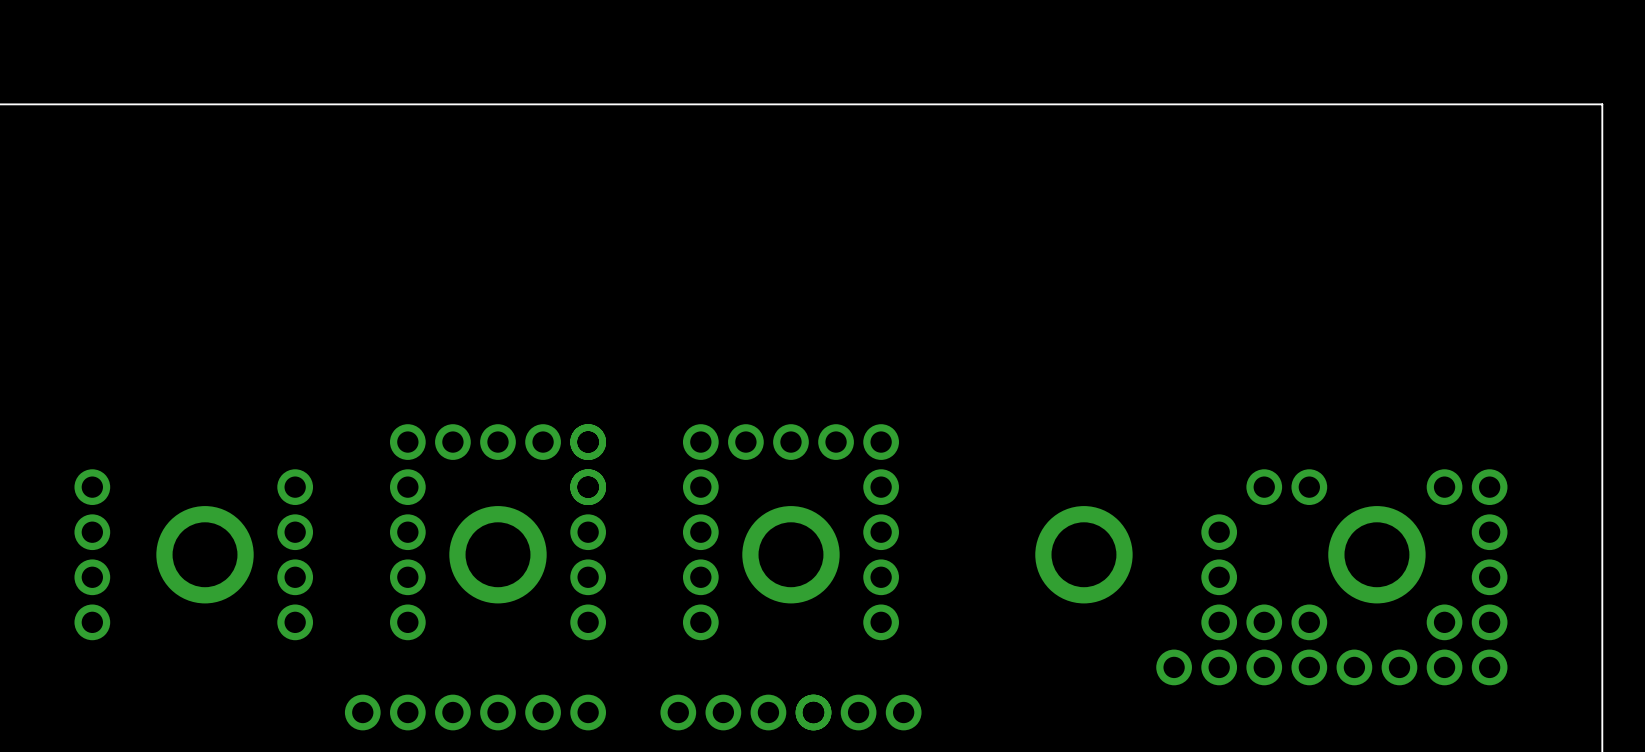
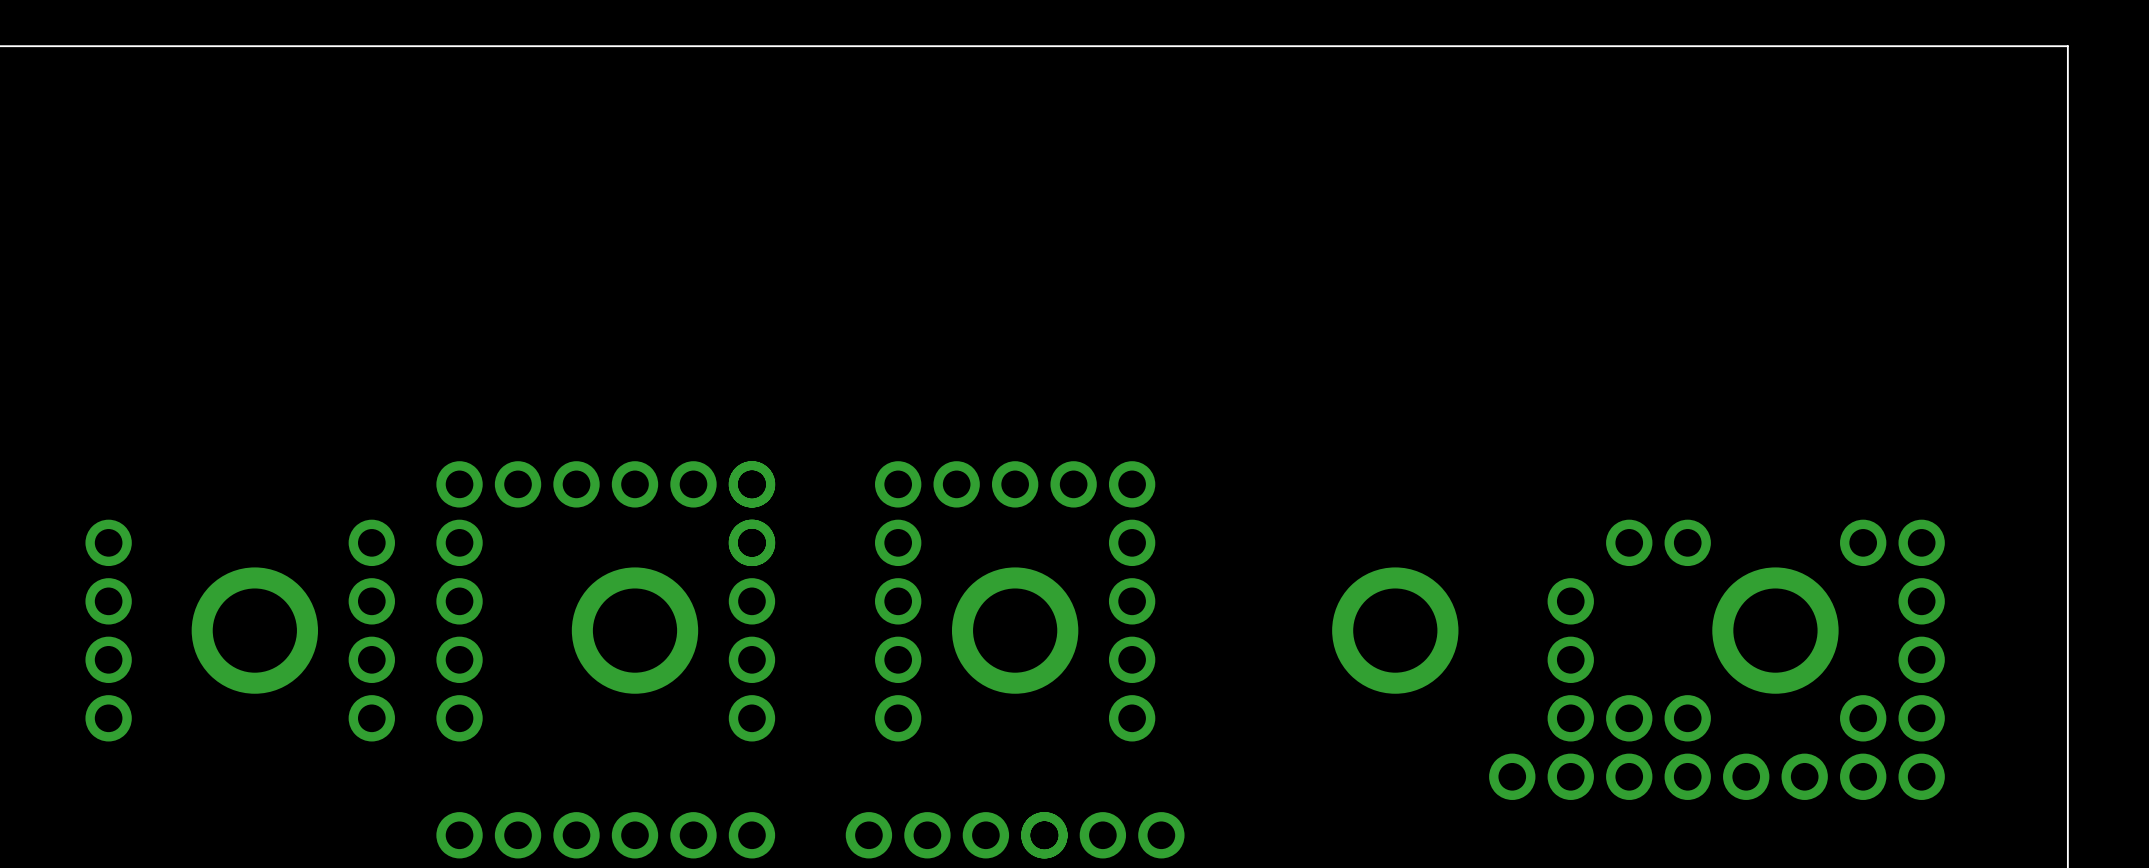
via: none -> (459, 484)
via: none -> (459, 542)
via: (407, 487) -> none
via: none -> (459, 601)
via: (407, 532) -> none
via: none -> (459, 659)
via: (407, 577) -> none
via: none -> (459, 718)
via: (407, 622) -> none

